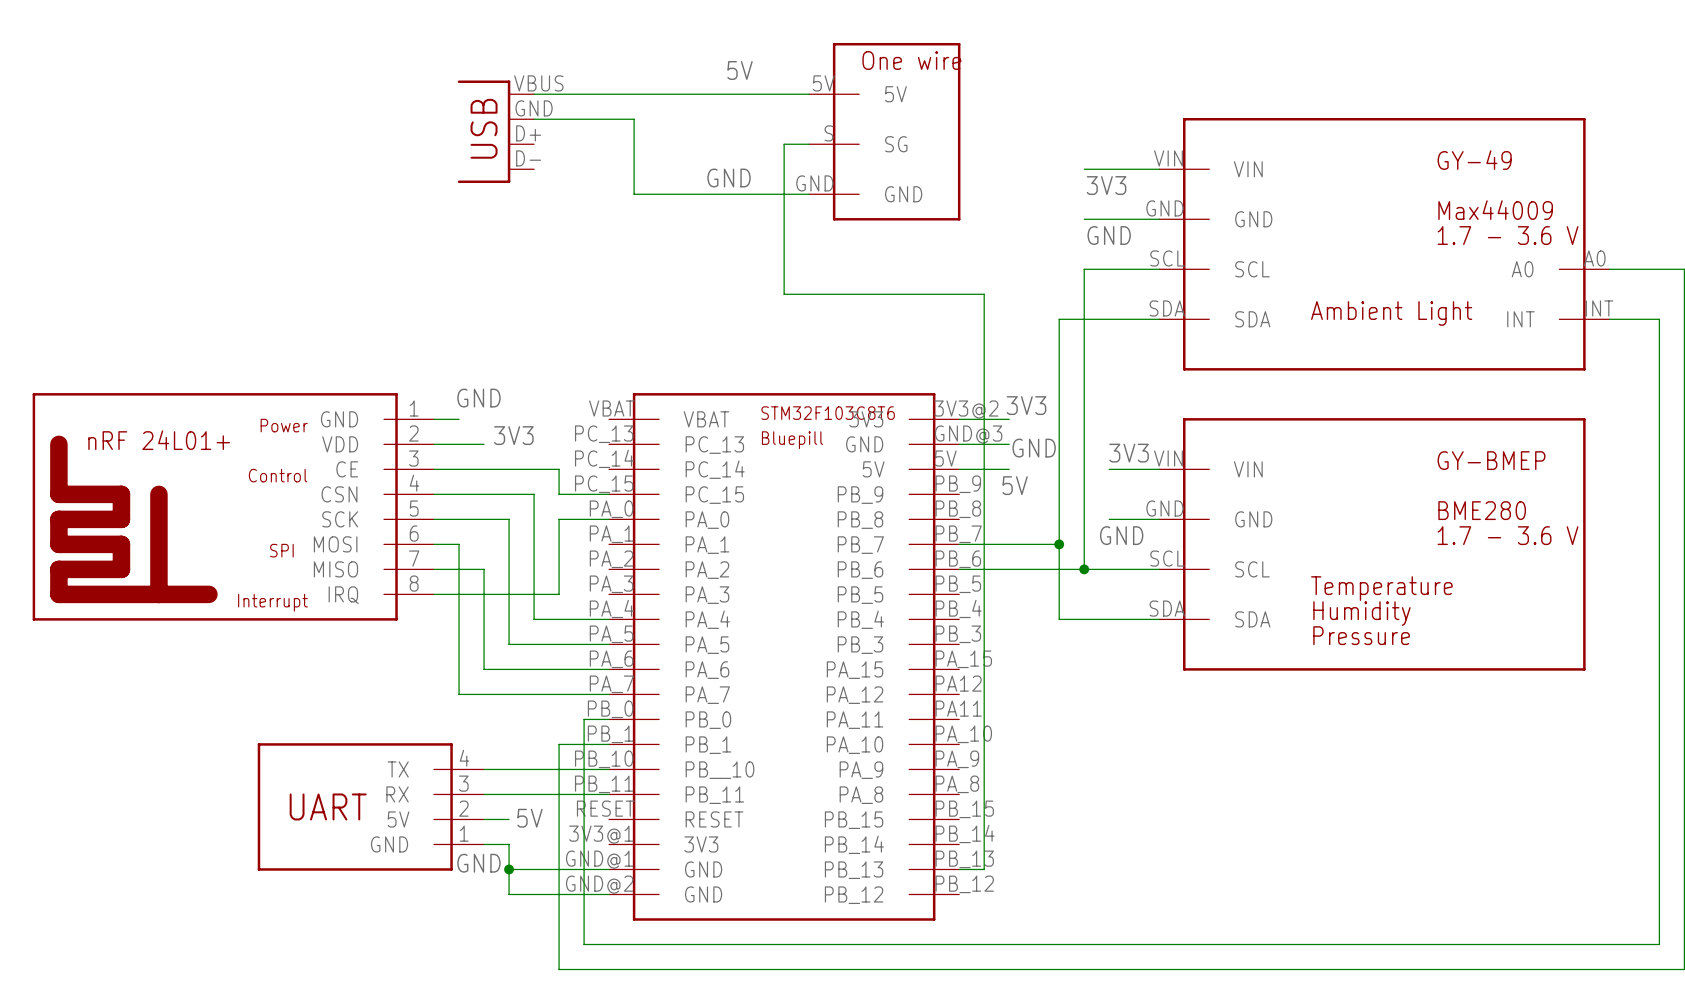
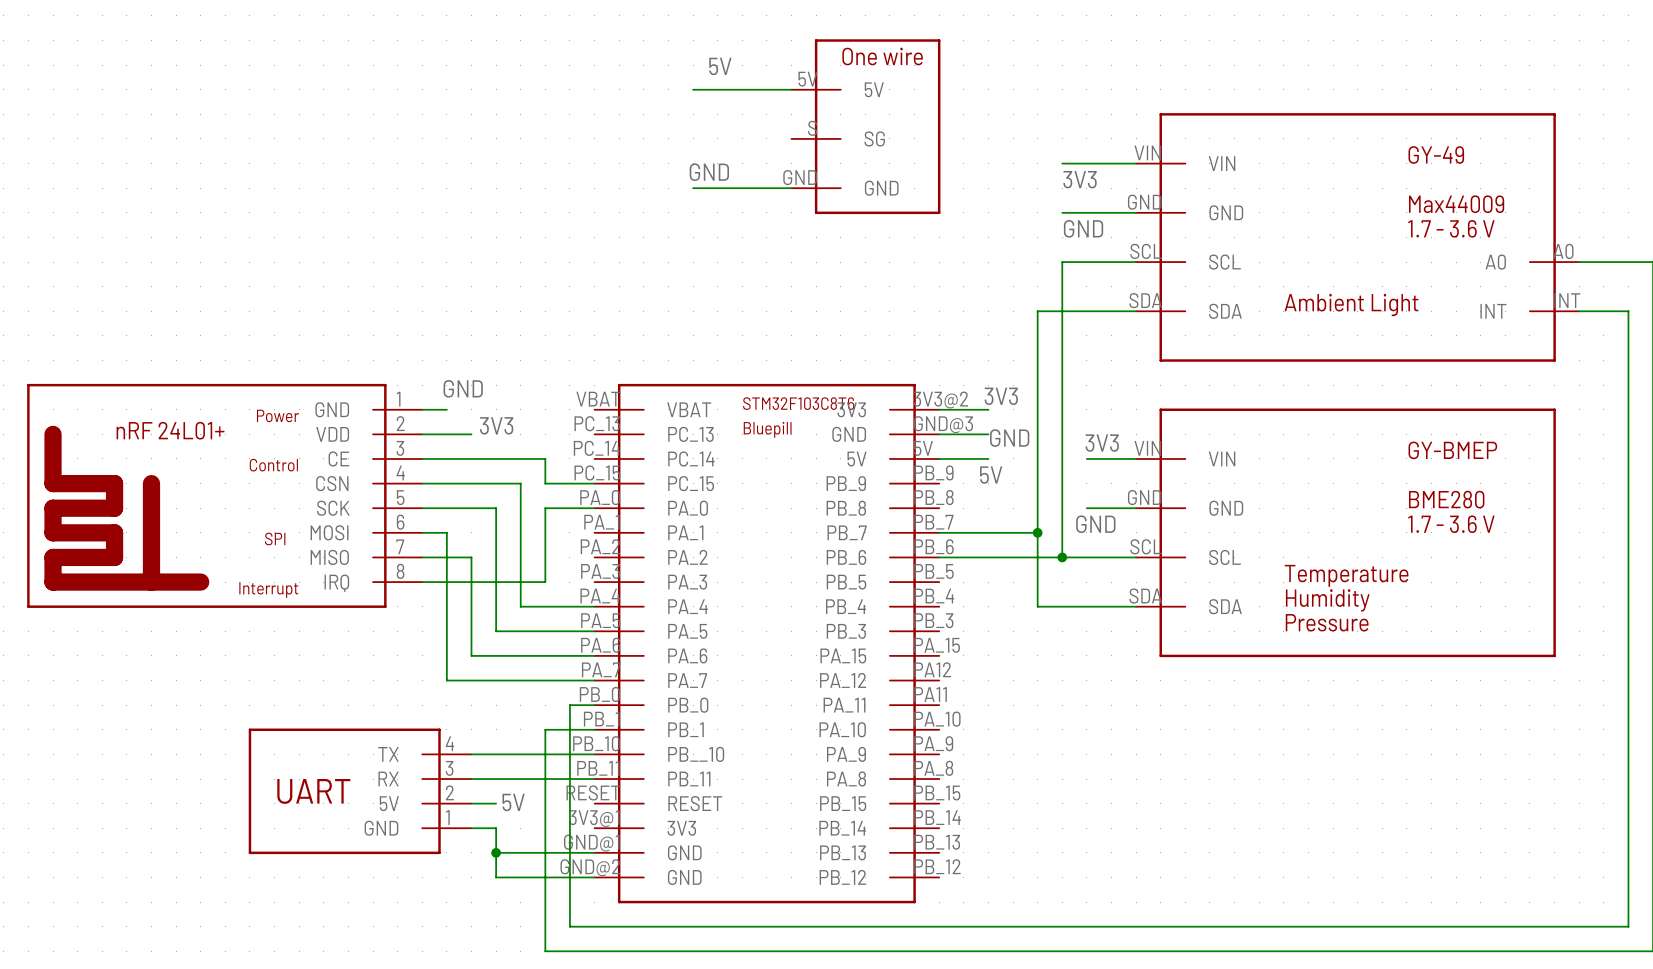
wire: (534, 94) (709, 94) -> none
wire: (534, 119) (634, 119) (634, 194) (709, 194) -> none
part: (495, 131) -> none
wire: (809, 144) (784, 144) (784, 294) (984, 294) (984, 869) (959, 869) -> none
label: GND (478, 863) -> none

